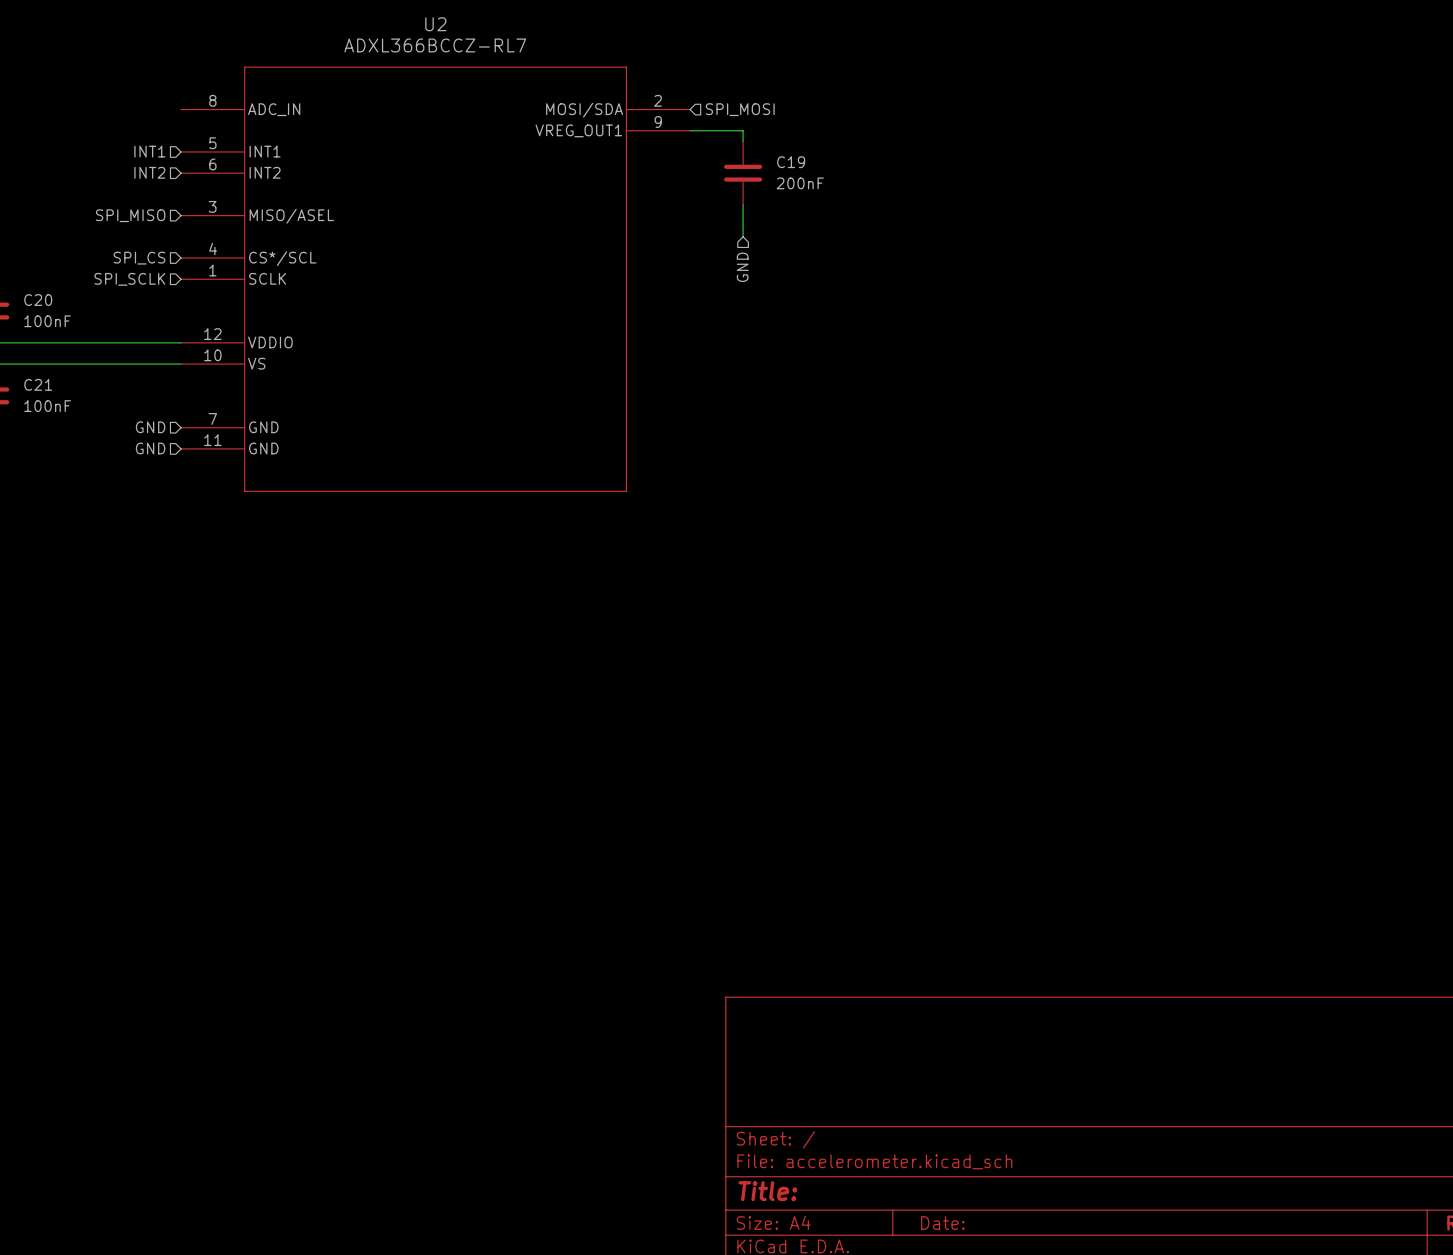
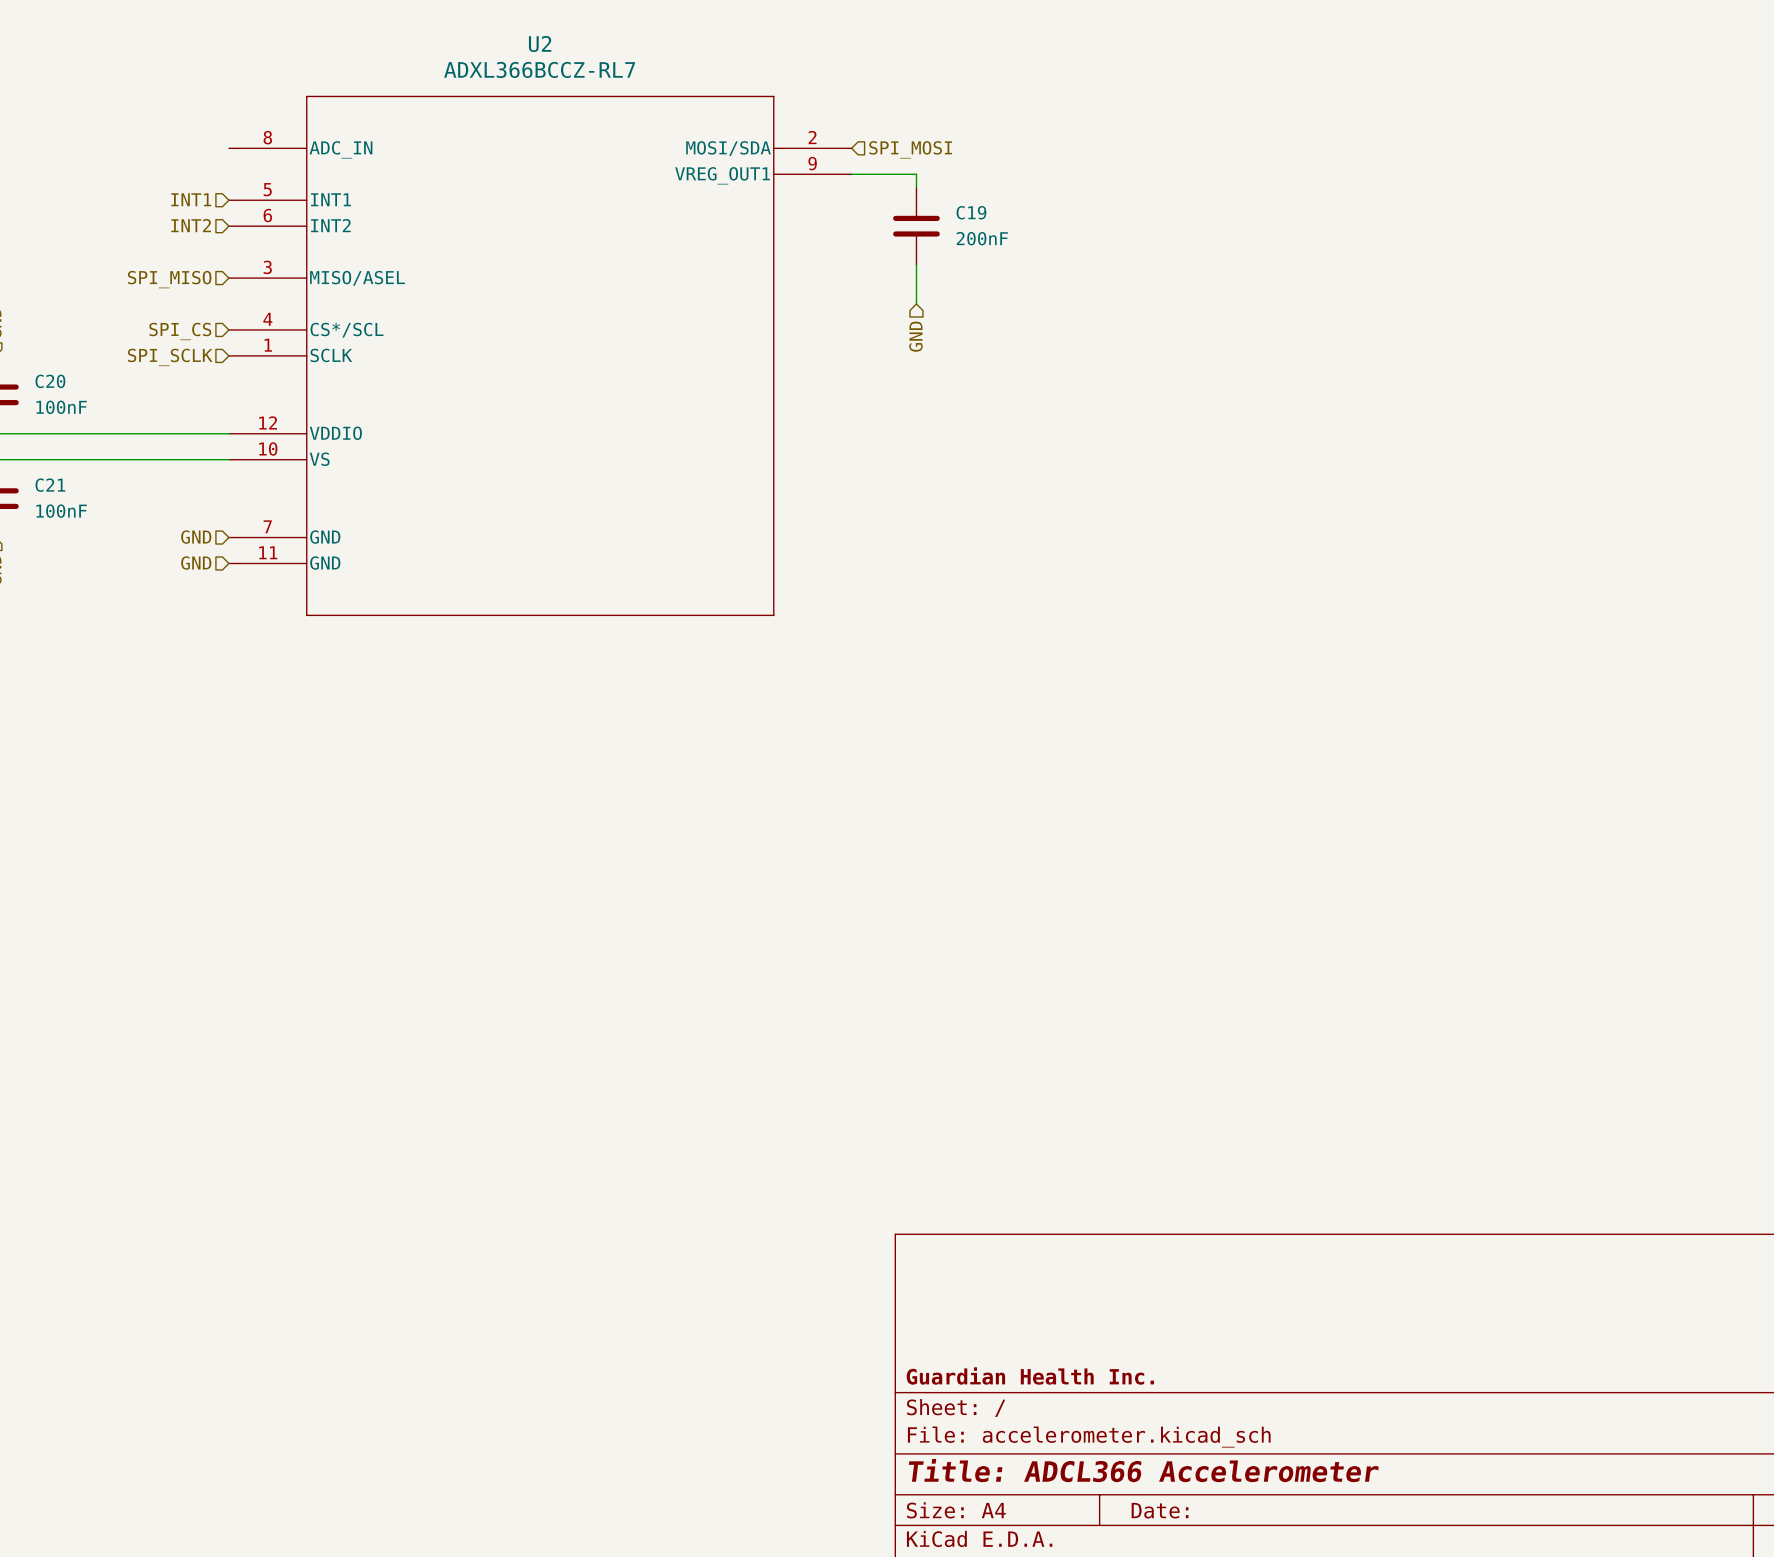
title block: none -> Guardian Health Inc. (1030, 1375)
title block: Title: (767, 1191) -> Title: ADCL366 Accelerometer (1143, 1470)

